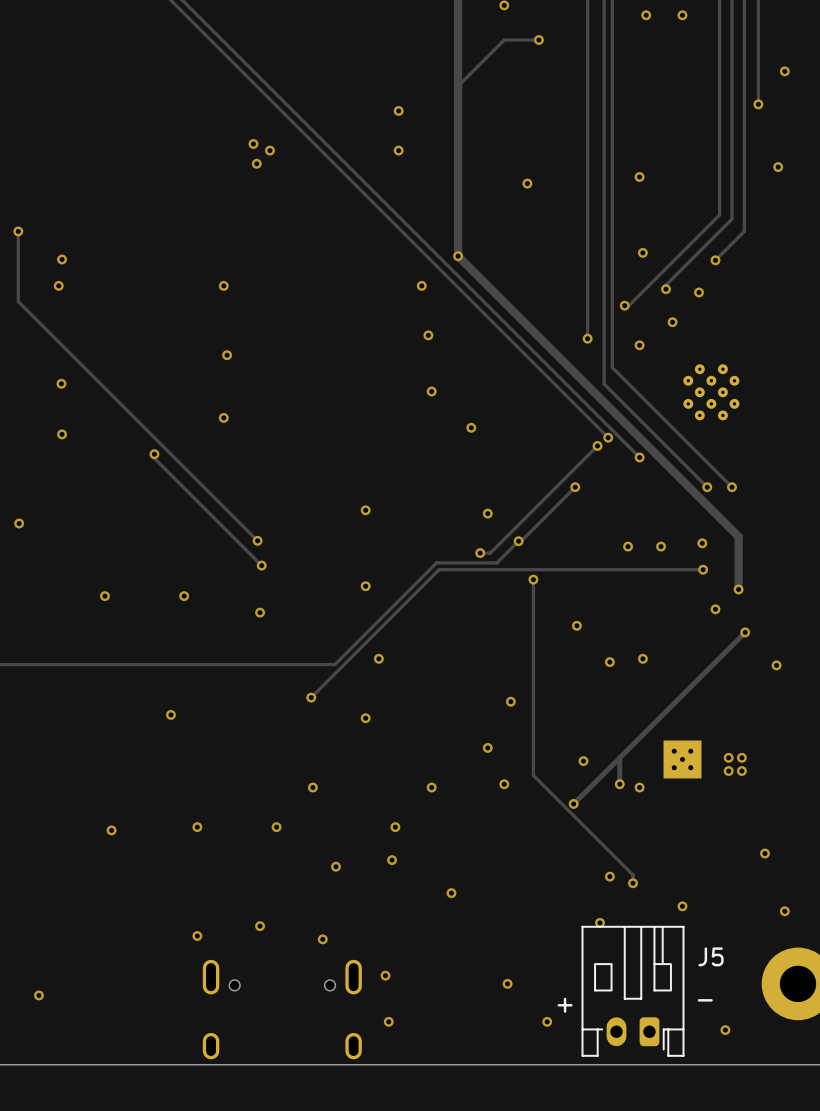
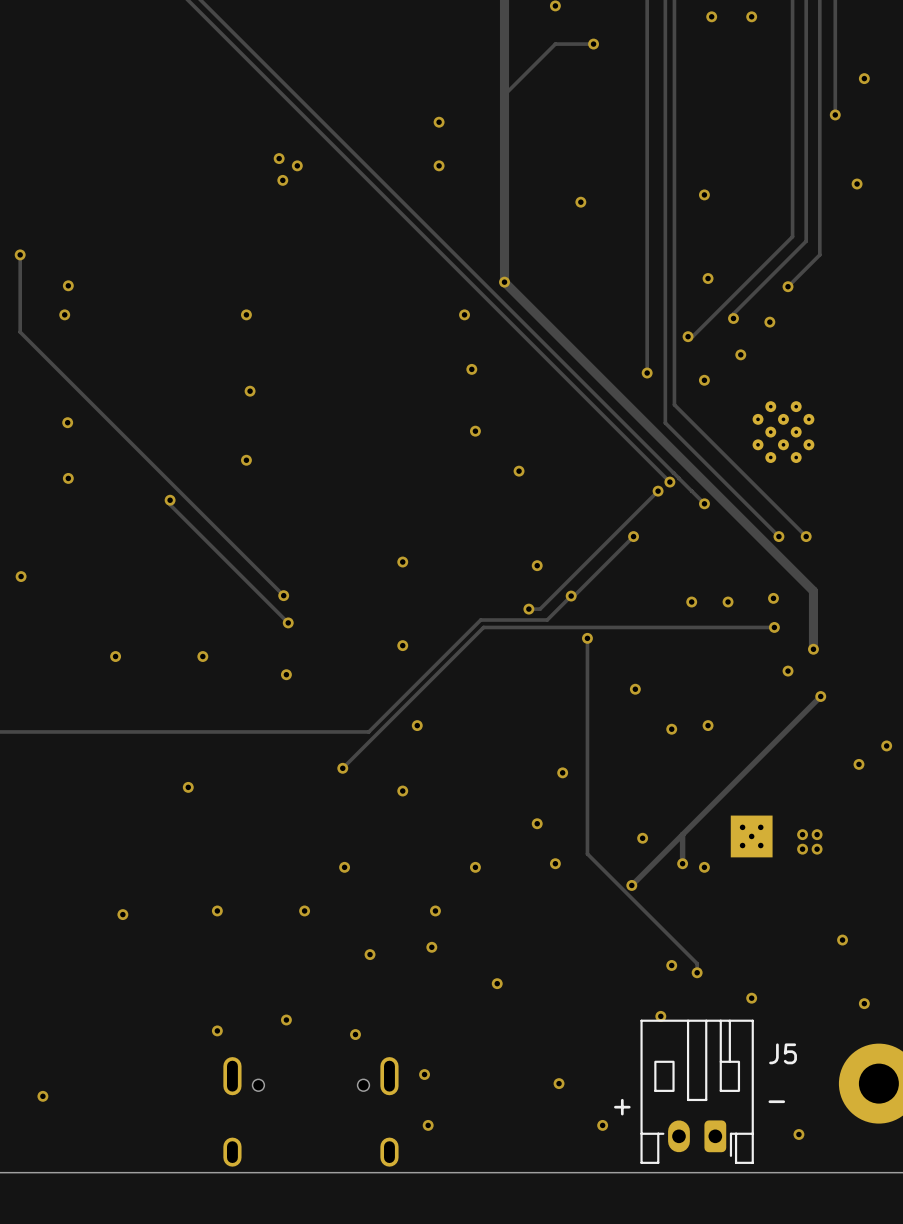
via: (776, 665) -> none
via: none -> (886, 745)
via: none -> (858, 764)

